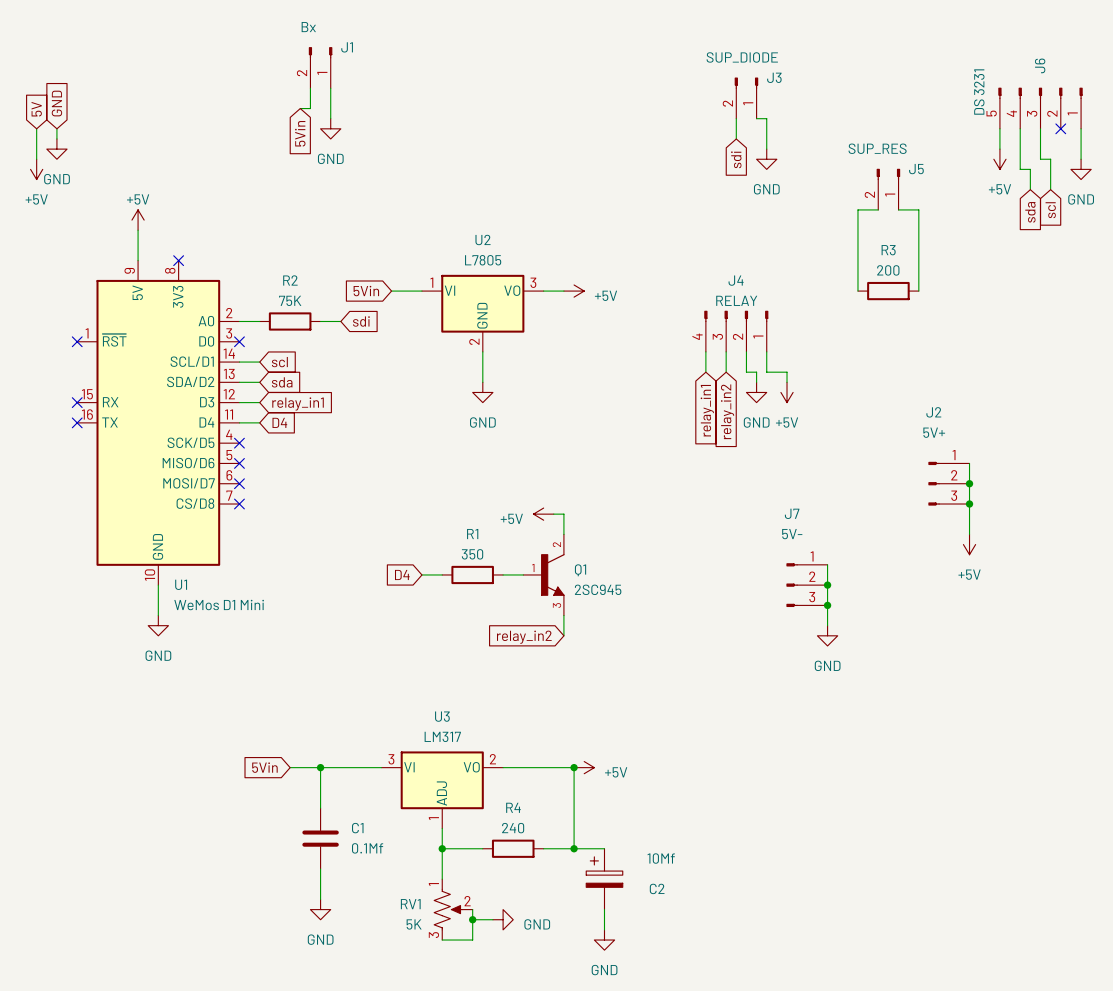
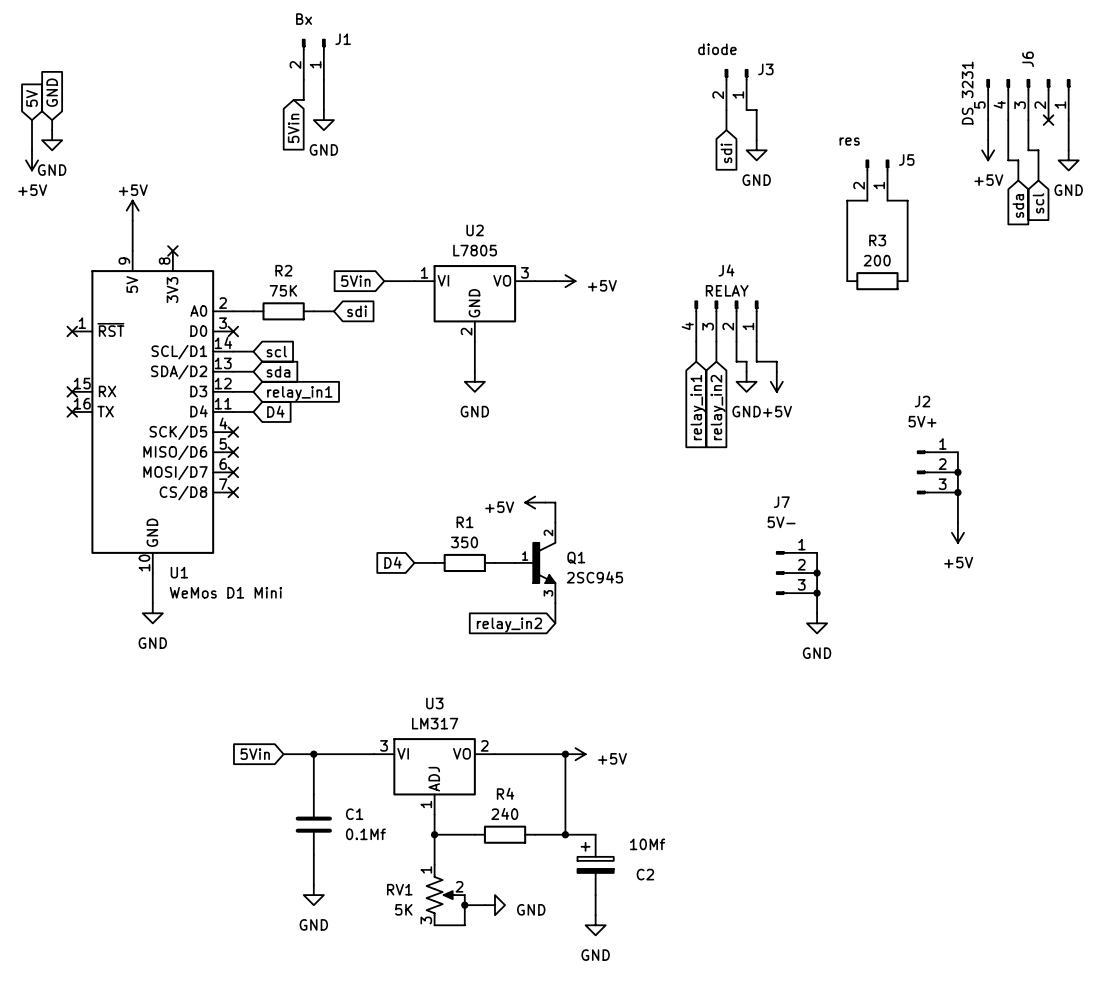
J3 value: SUP_DIODE (742, 57) -> diode (717, 49)
J5 value: SUP_RES (877, 148) -> res (849, 141)

